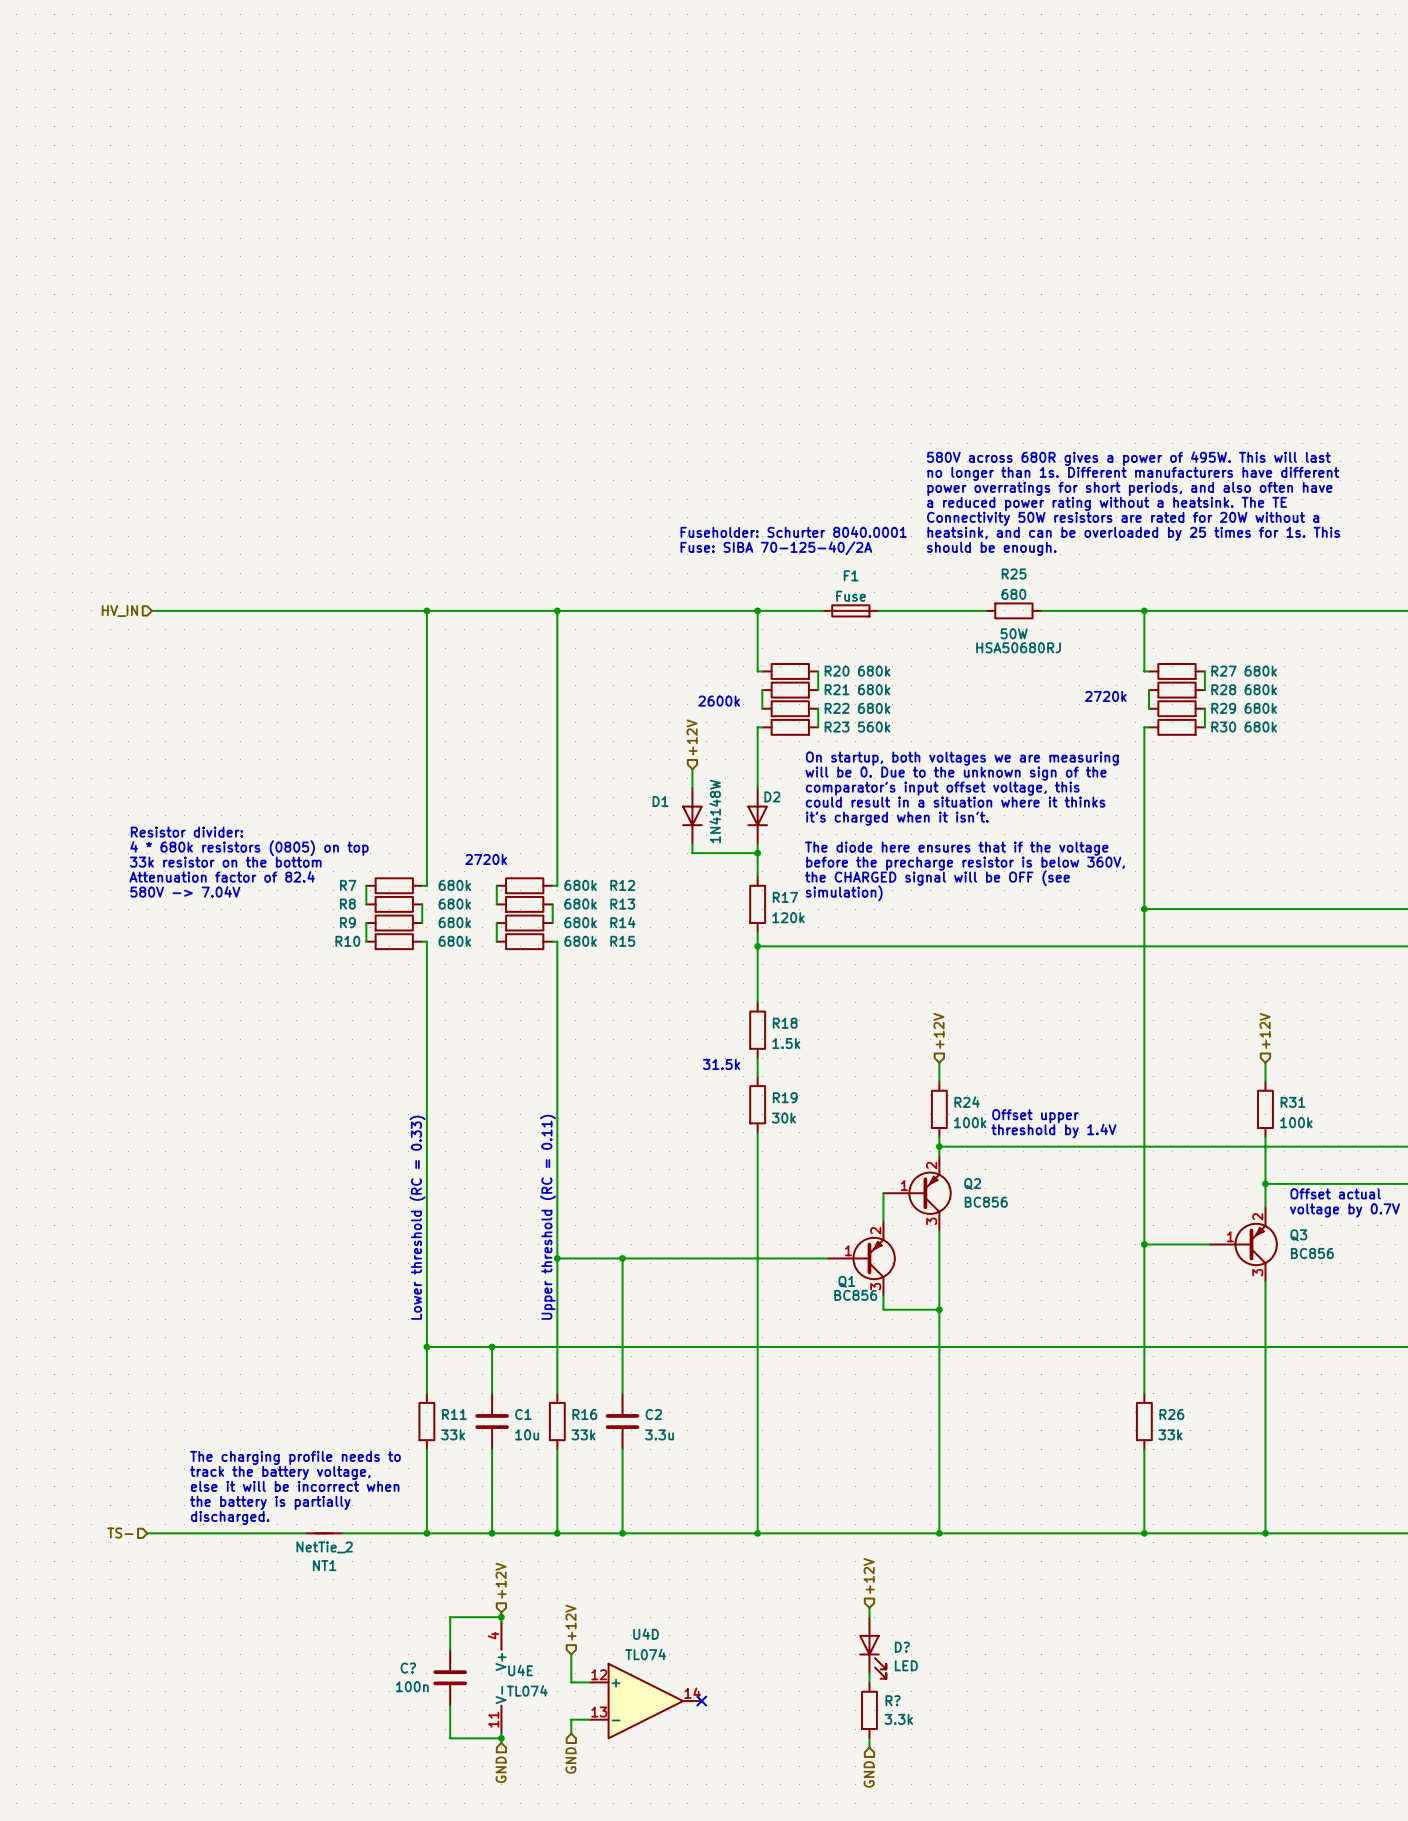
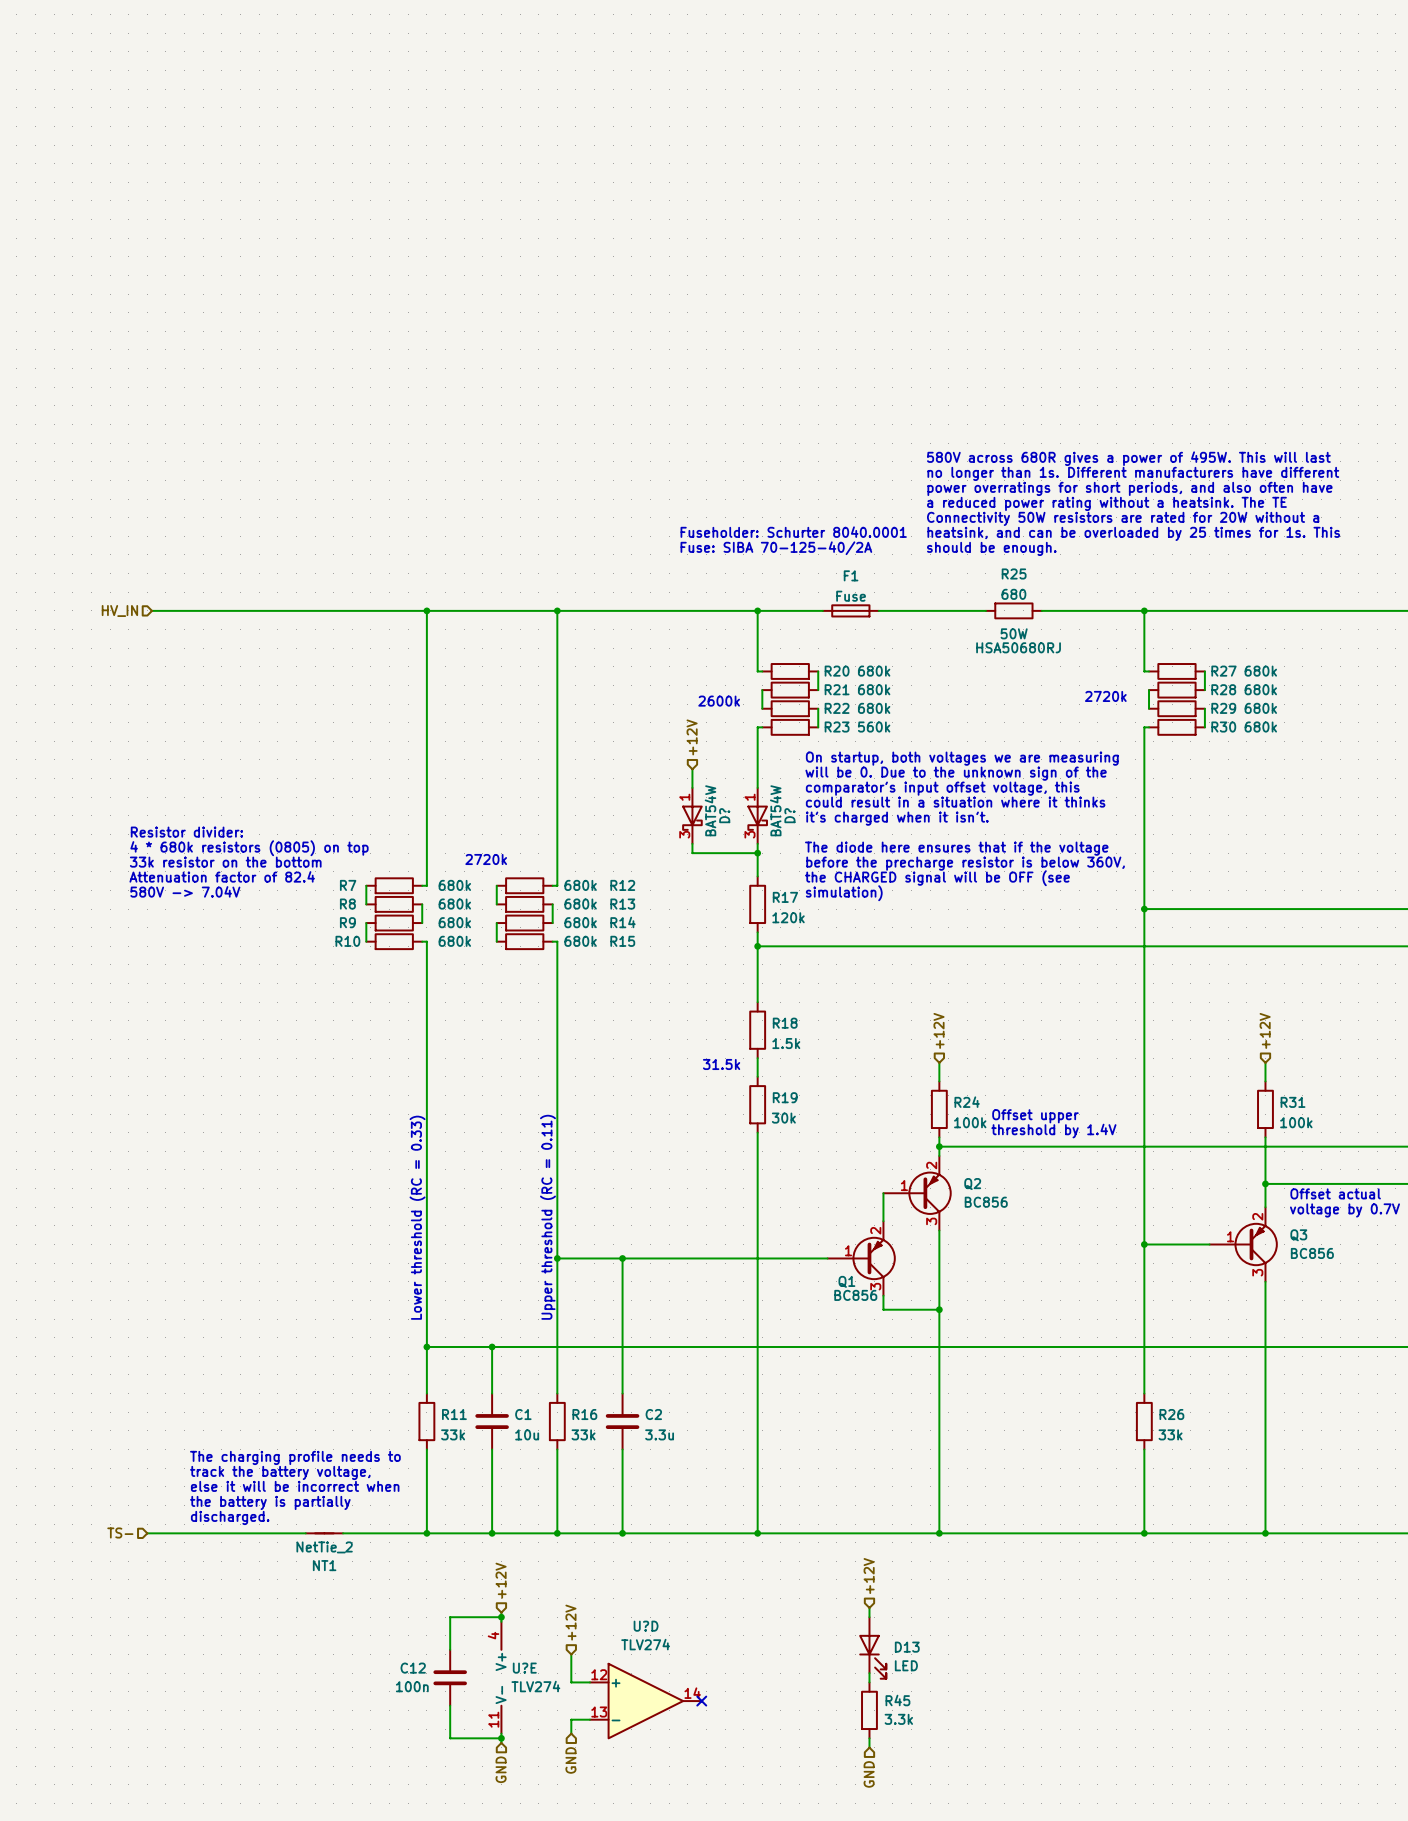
D1: 1N4148W (692, 815) -> none
D?: none -> BAT54W (692, 815)
D2: (757, 815) -> none
D?: none -> BAT54W (757, 815)
U4D name: U4D (646, 1634) -> U?D (646, 1626)
D? name: D? (902, 1647) -> D13 (907, 1647)
U4D value: TL074 (645, 1654) -> TLV274 (645, 1644)
C? name: C? (408, 1668) -> C12 (413, 1668)
U4E name: U4E (520, 1670) -> U?E (524, 1668)
U4E value: TL074 (527, 1690) -> TLV274 (535, 1686)
R? name: R? (893, 1700) -> R45 (897, 1700)

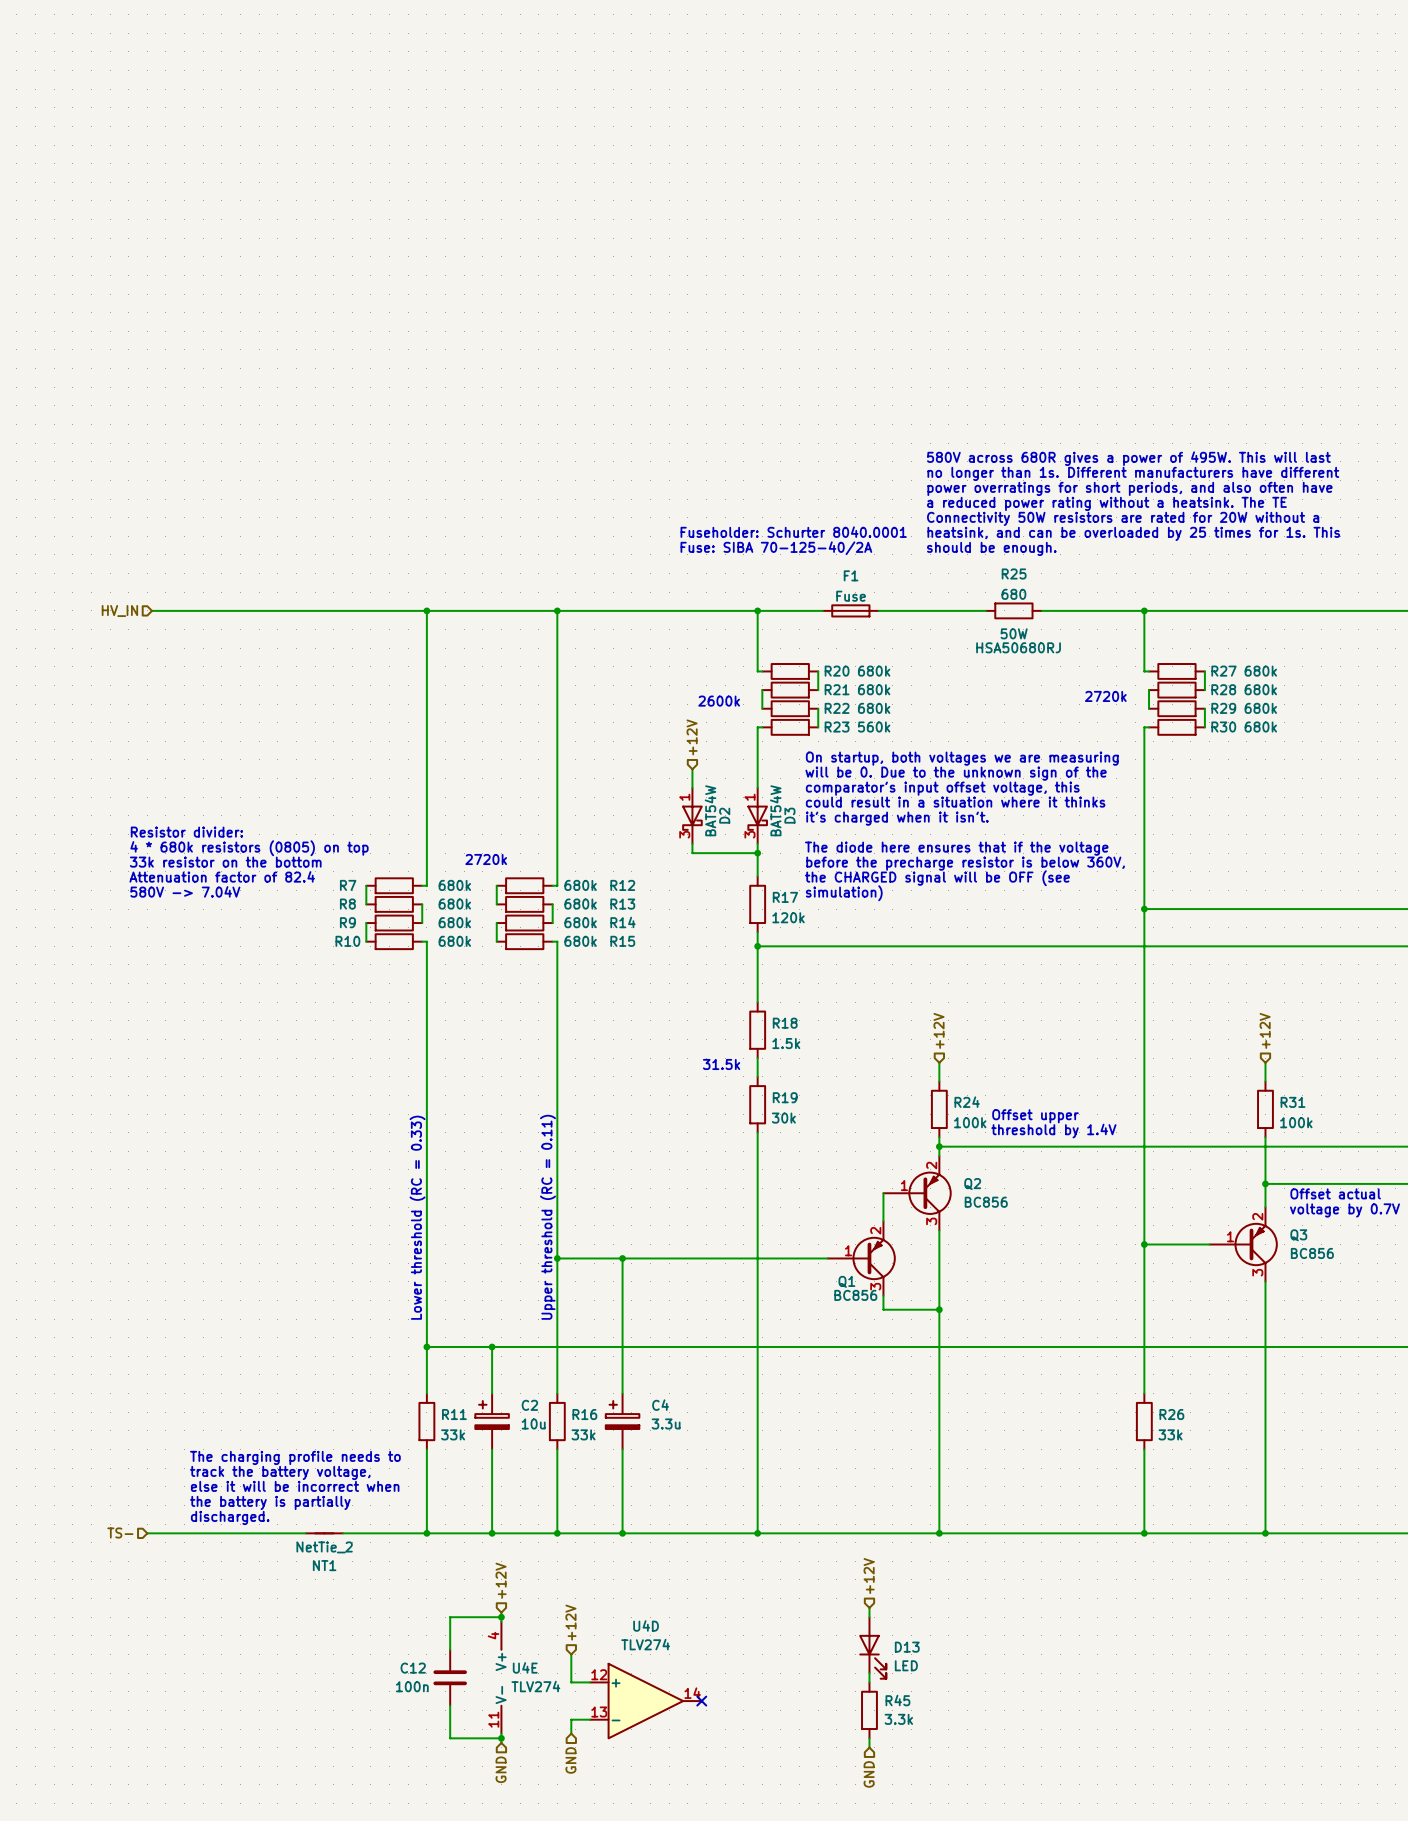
D? name: D? (724, 815) -> D2 (724, 815)
D? name: D? (789, 815) -> D3 (789, 815)
C2 symbol: [605, 1393, 640, 1450] -> [475, 1393, 509, 1450]
C1: 10u (492, 1421) -> none
C4: none -> 3.3u (622, 1421)
C2 value: 3.3u (659, 1434) -> 10u (533, 1423)
U?D name: U?D (646, 1626) -> U4D (646, 1625)
U?E name: U?E (524, 1668) -> U4E (525, 1667)

